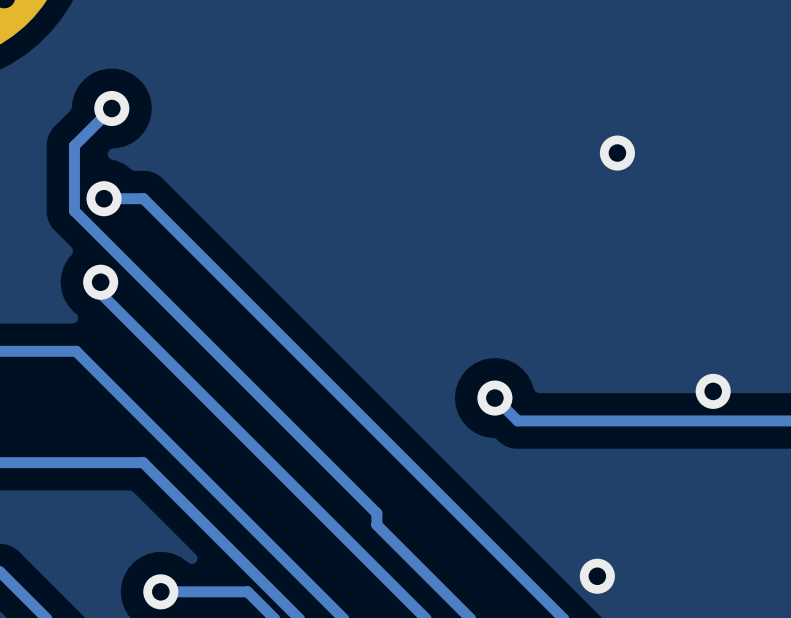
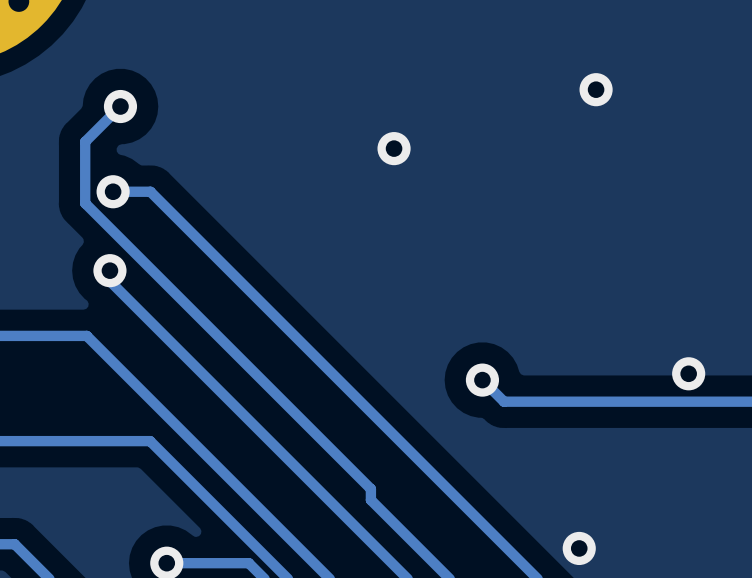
via: none -> (394, 148)
via position: (617, 153) -> (596, 89)

